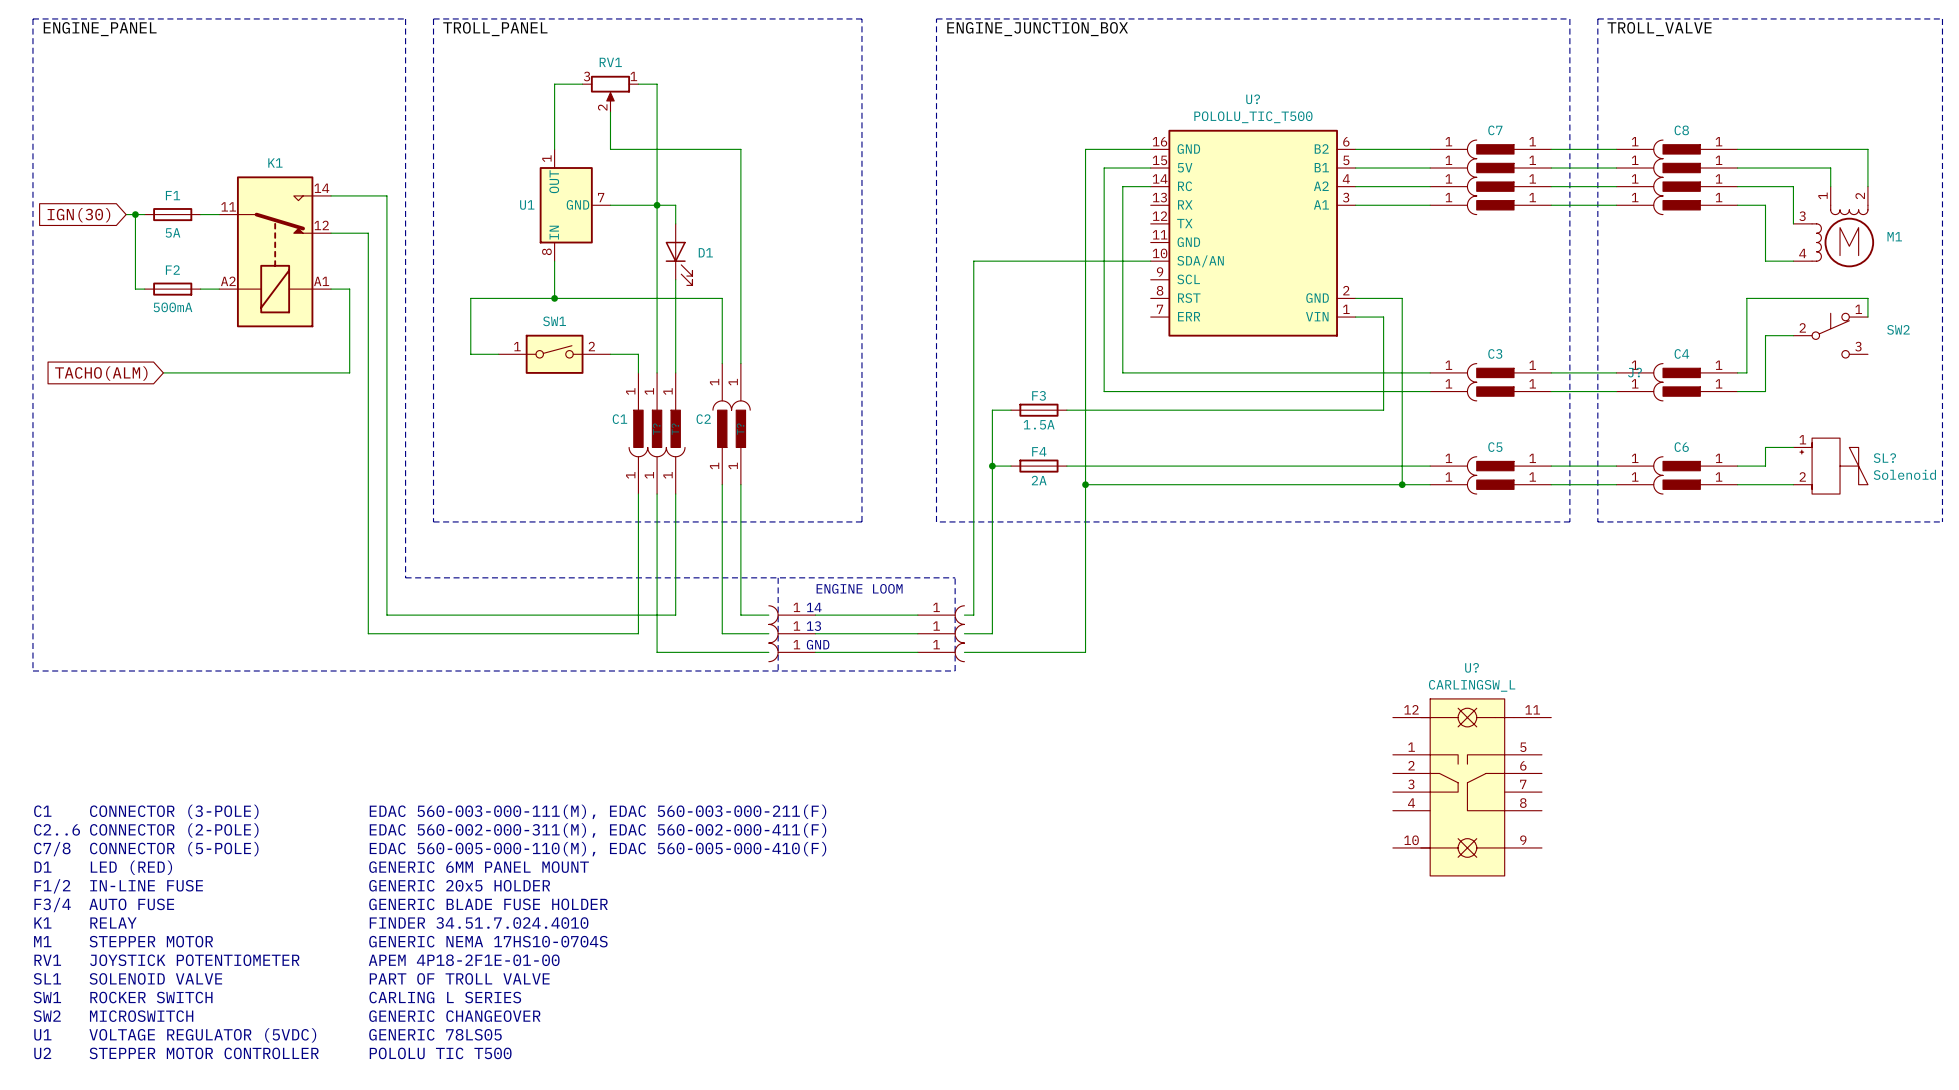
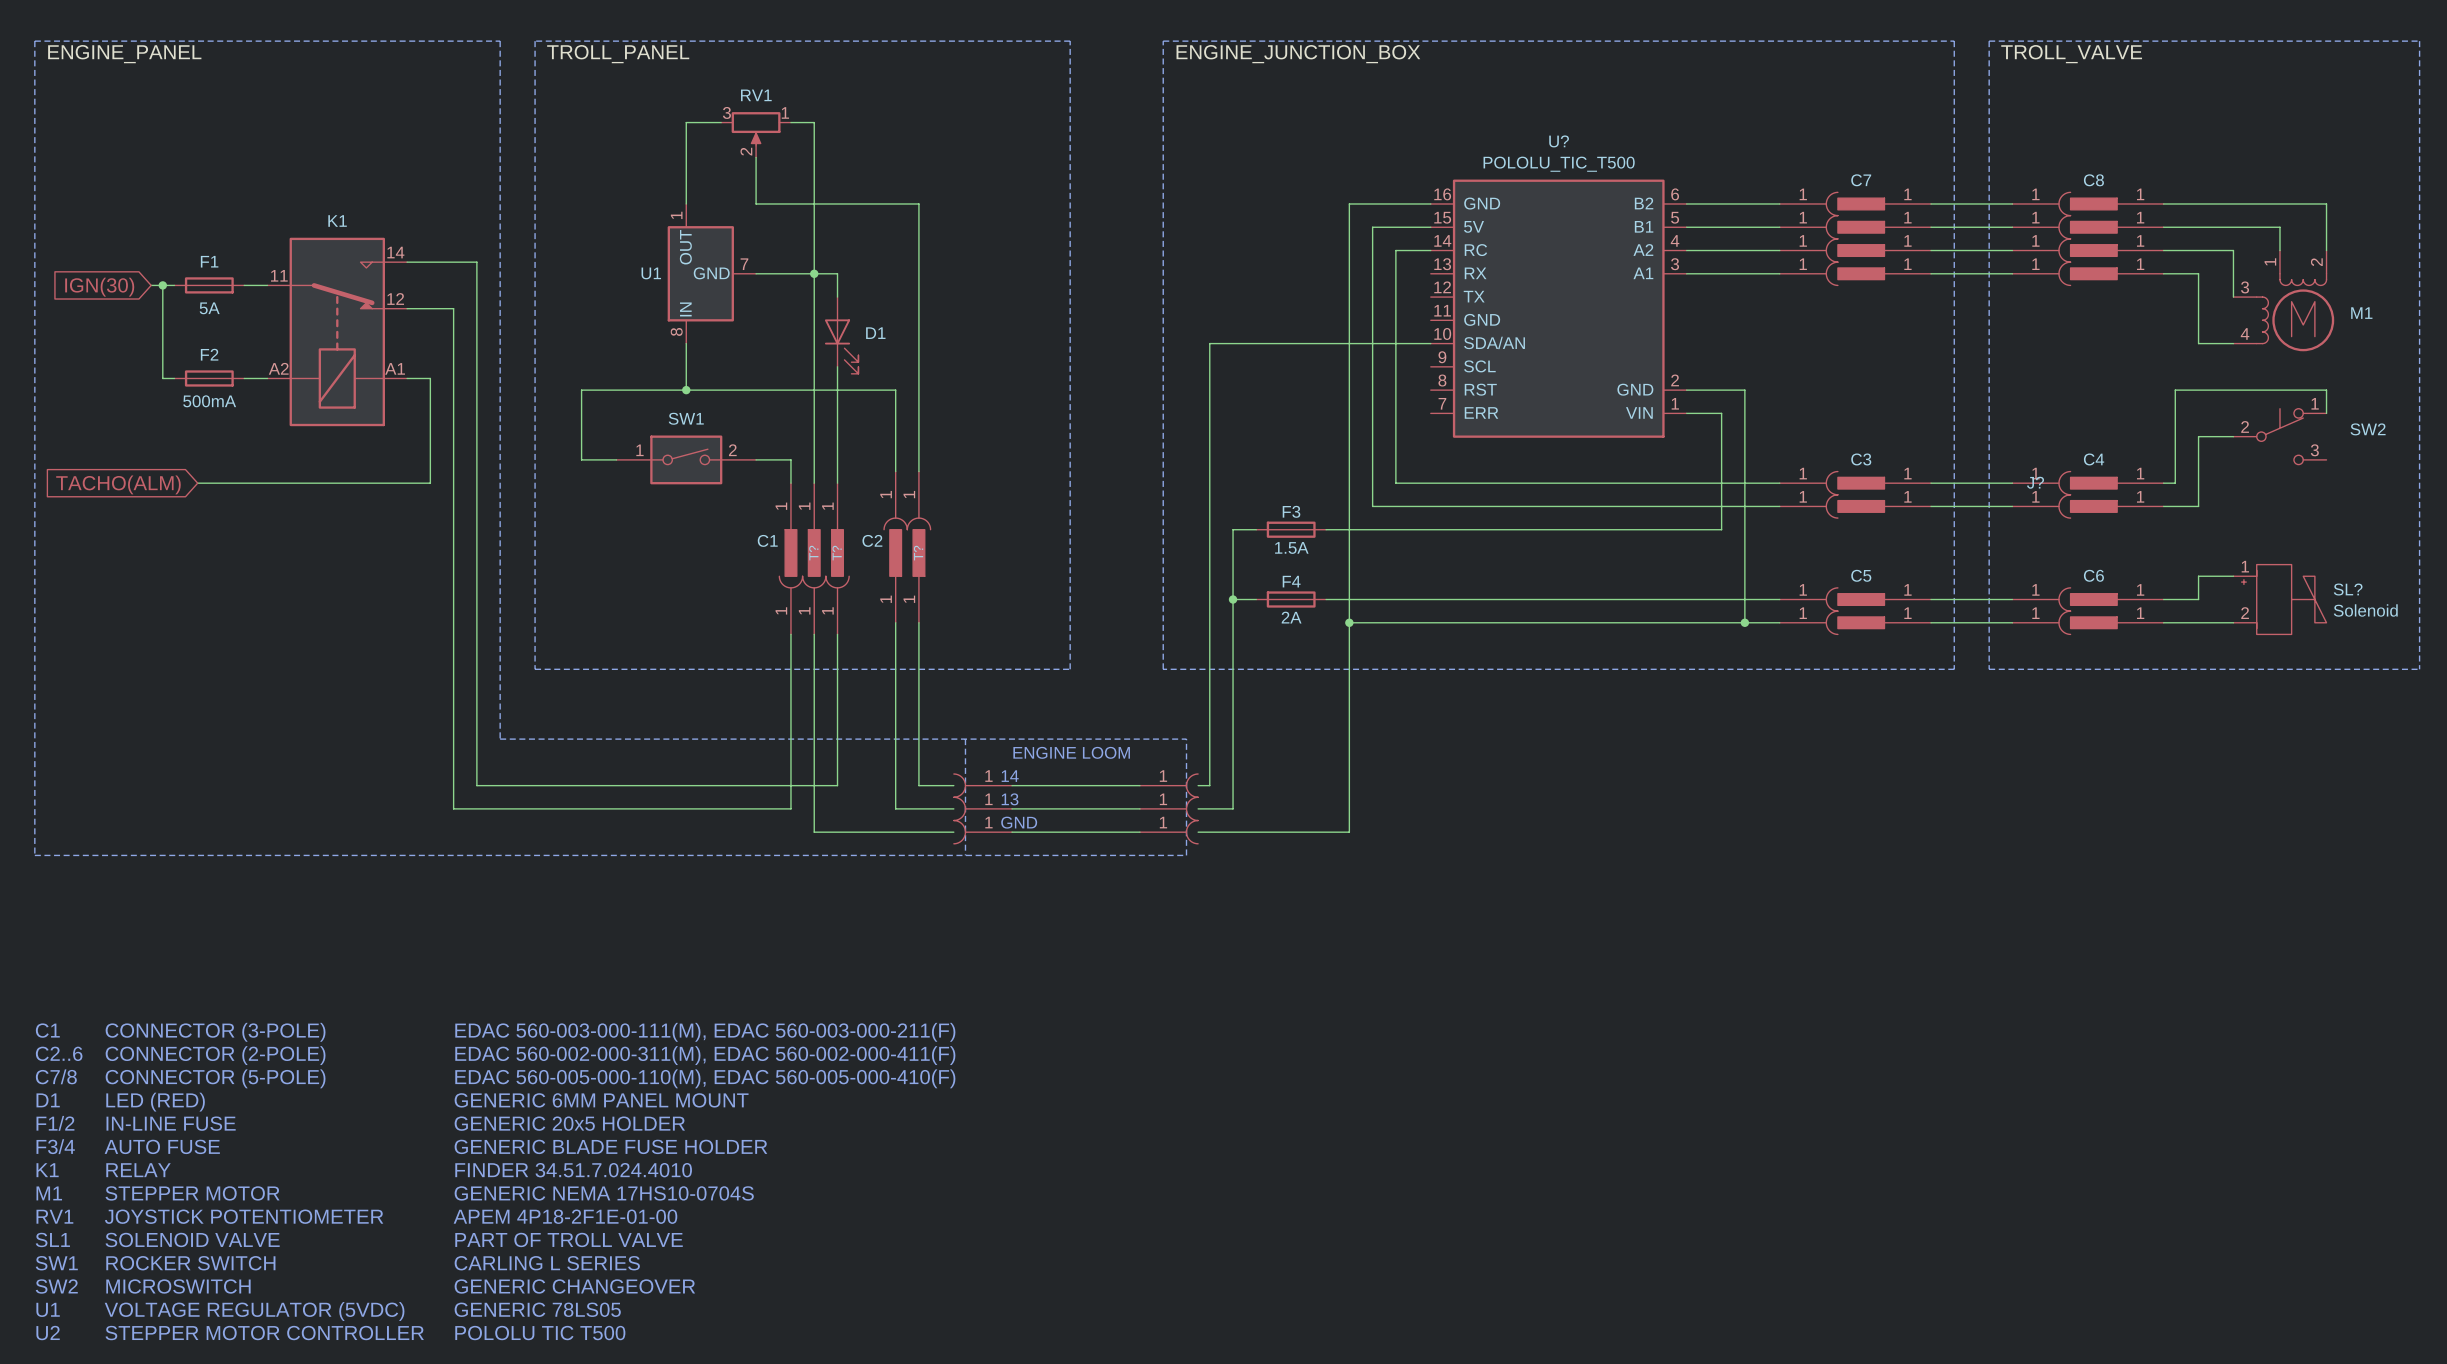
U?: CARLINGSW_L (1472, 787) -> none

